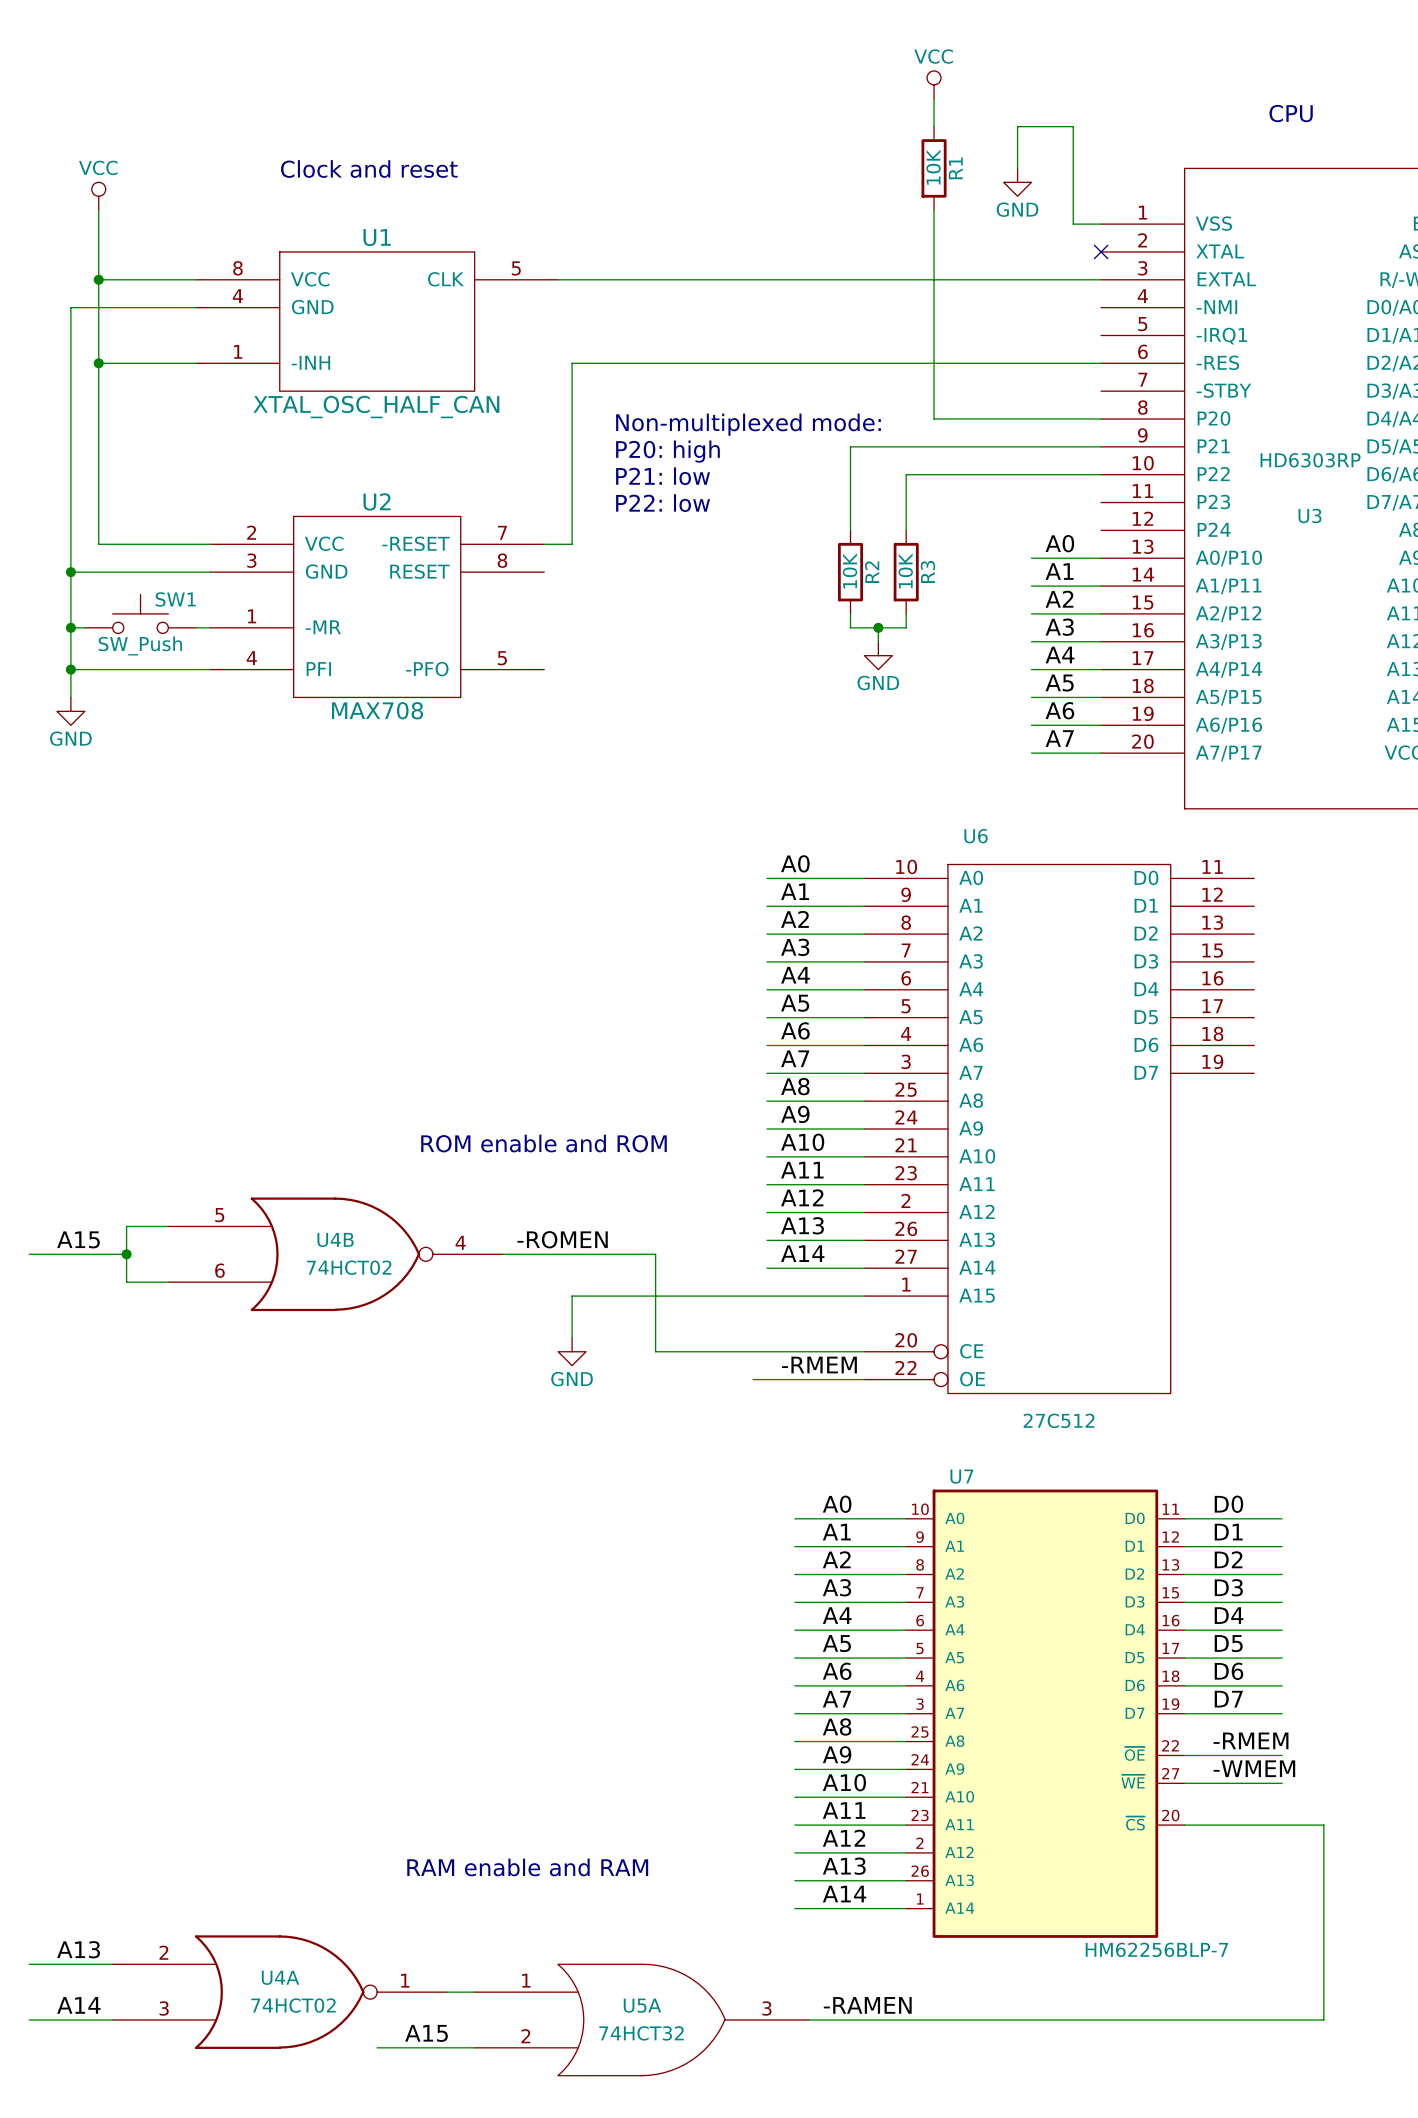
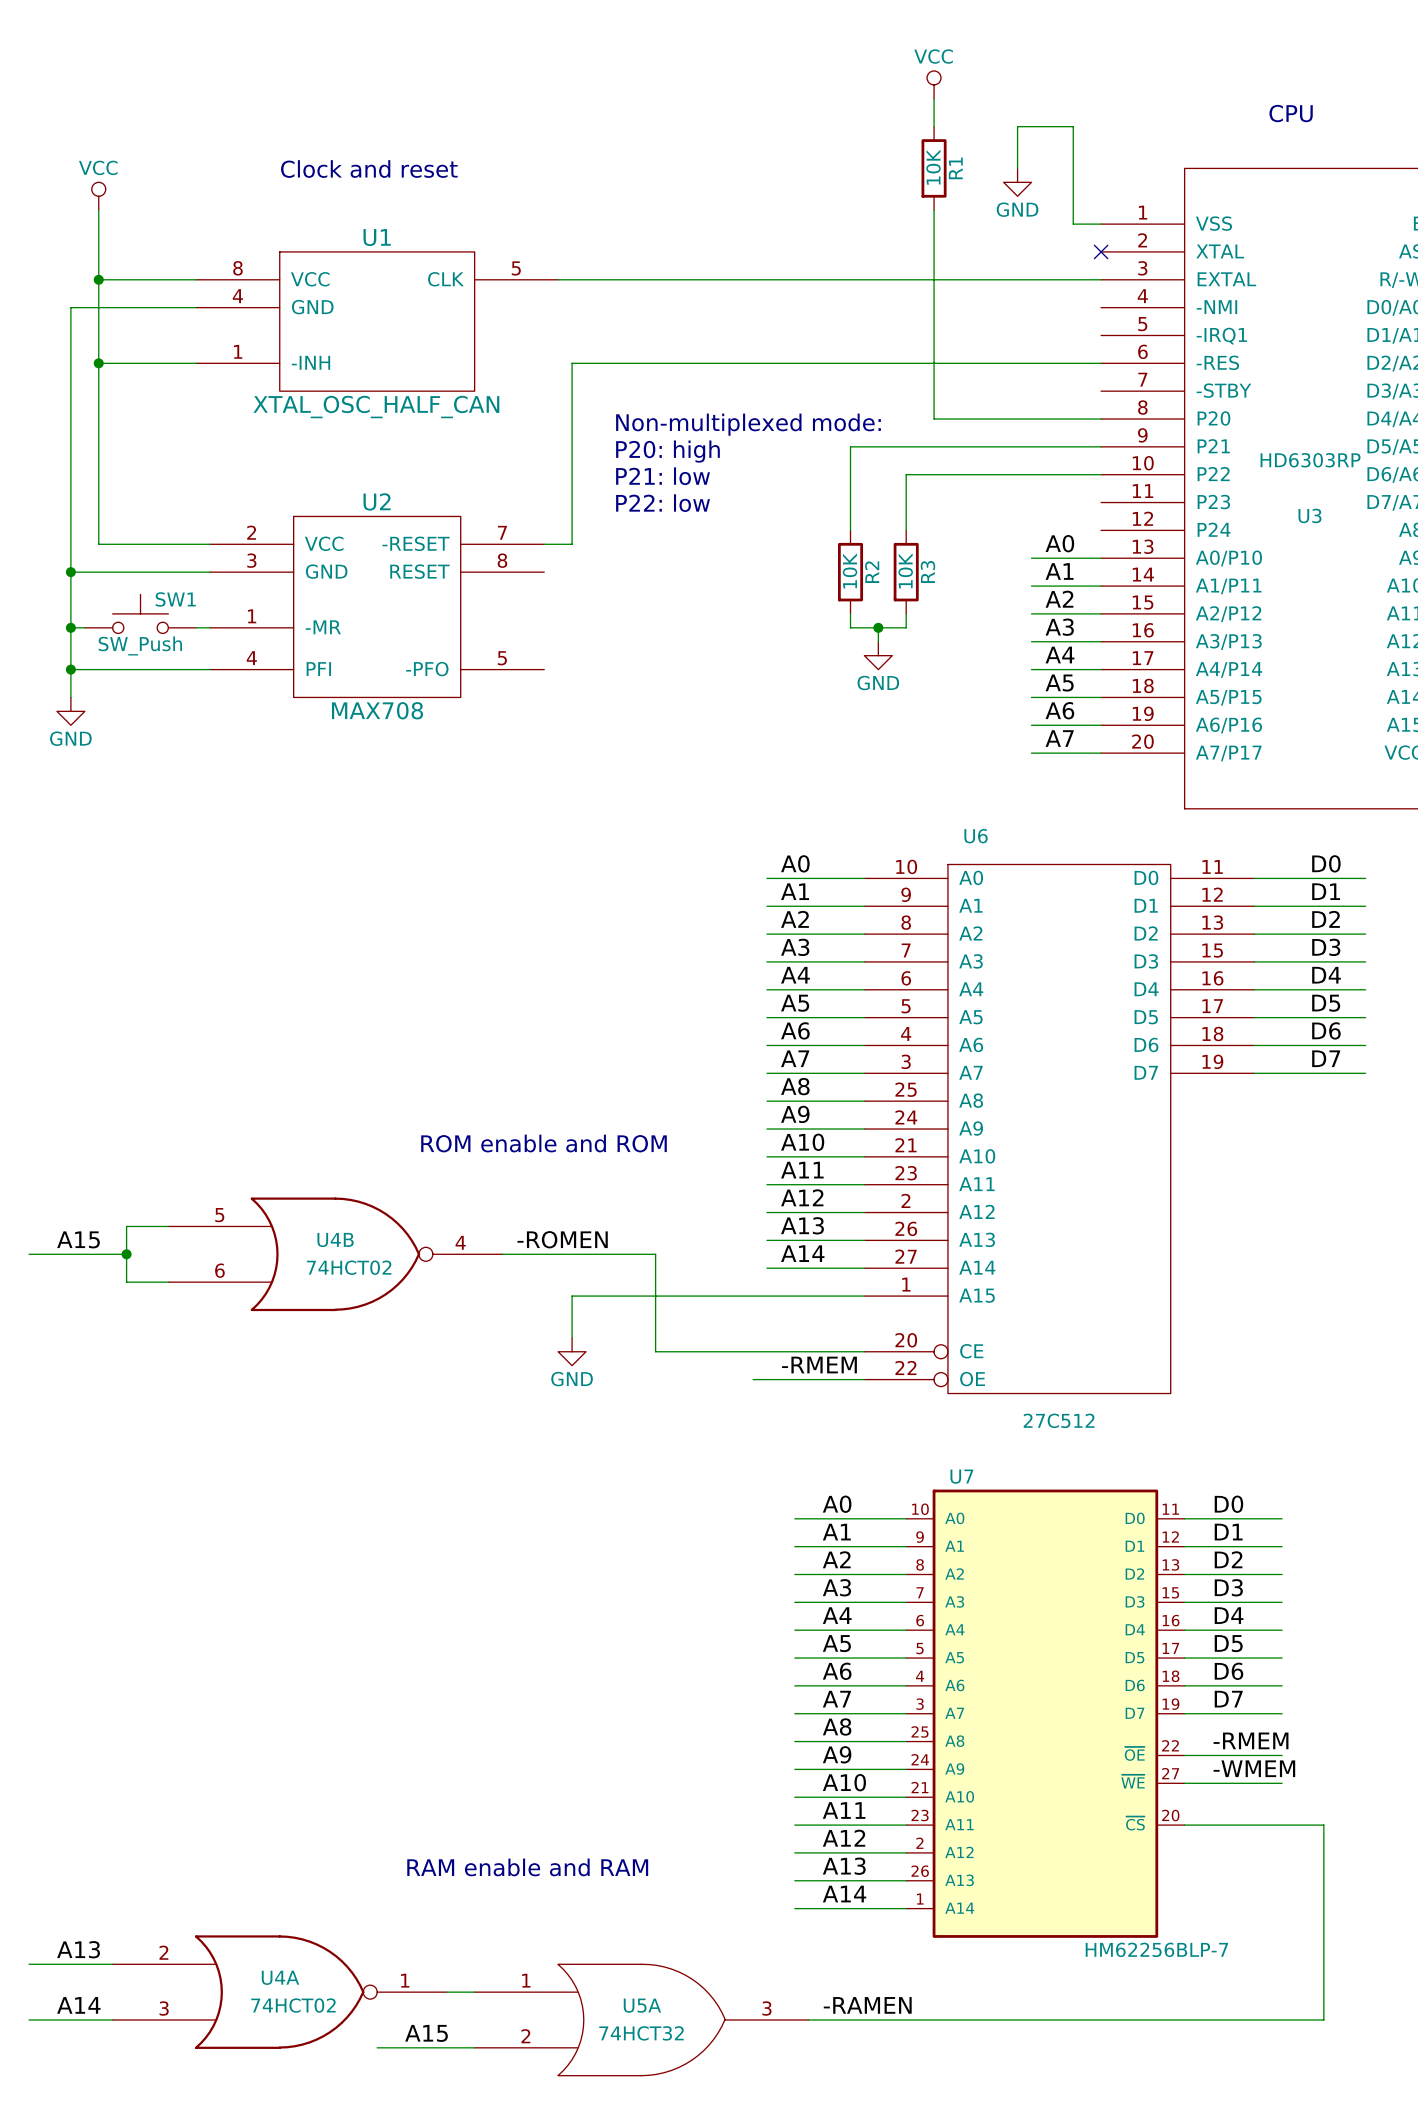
label: none -> D0 (1326, 863)
wire: none -> (1254, 878) (1365, 878)
label: none -> D1 (1326, 891)
wire: none -> (1254, 906) (1365, 906)
label: none -> D2 (1326, 919)
wire: none -> (1254, 934) (1365, 934)
label: none -> D3 (1326, 947)
wire: none -> (1254, 961) (1365, 961)
label: none -> D4 (1326, 975)
wire: none -> (1254, 989) (1365, 989)
label: none -> D5 (1326, 1003)
wire: none -> (1254, 1017) (1365, 1017)
label: none -> D6 (1326, 1030)
wire: none -> (1254, 1045) (1365, 1045)
label: none -> D7 (1326, 1058)
wire: none -> (1254, 1073) (1365, 1073)

